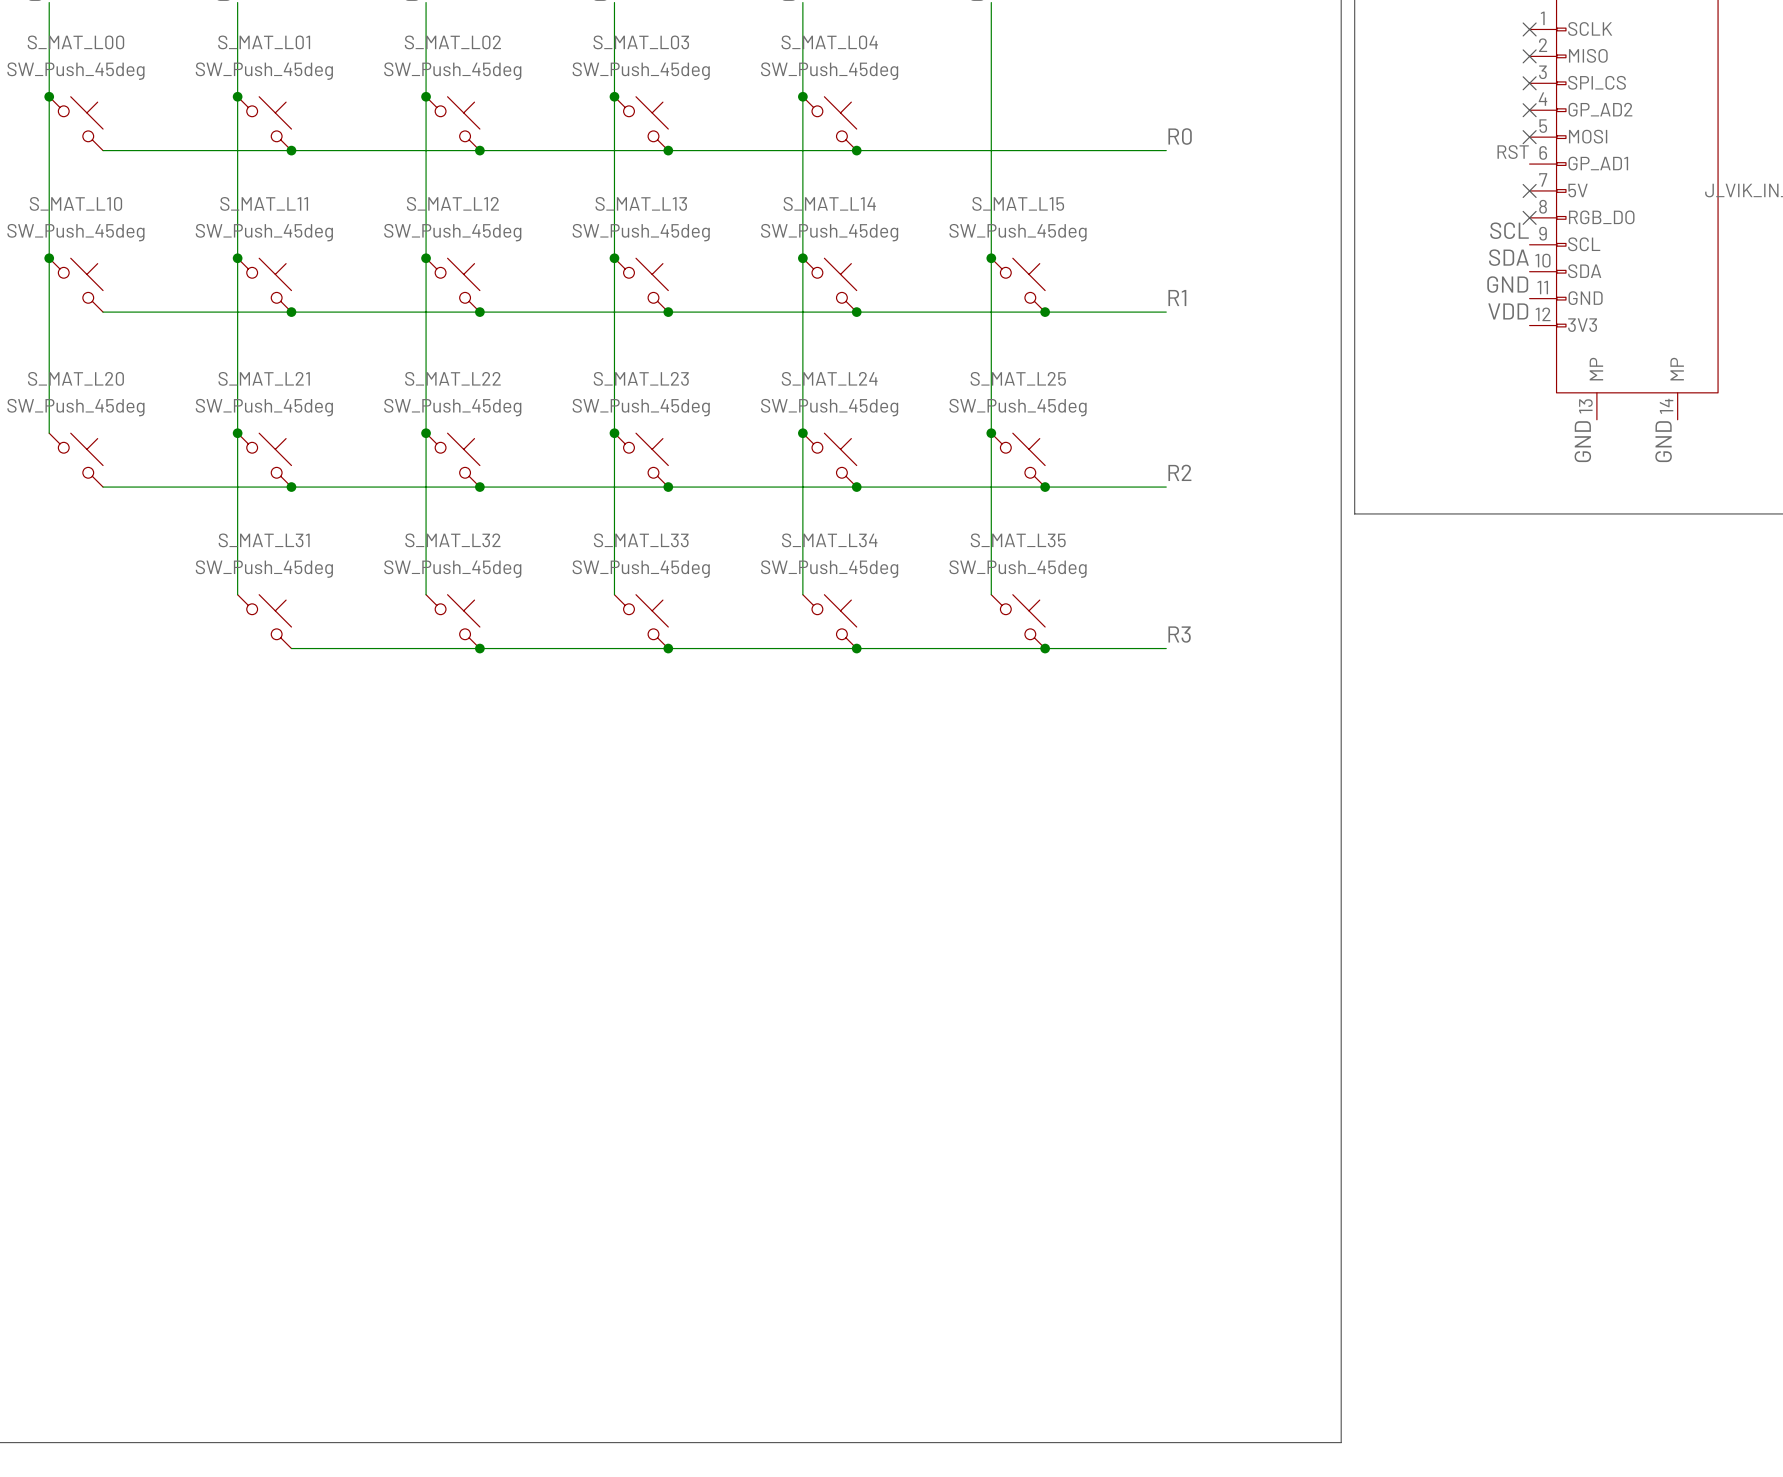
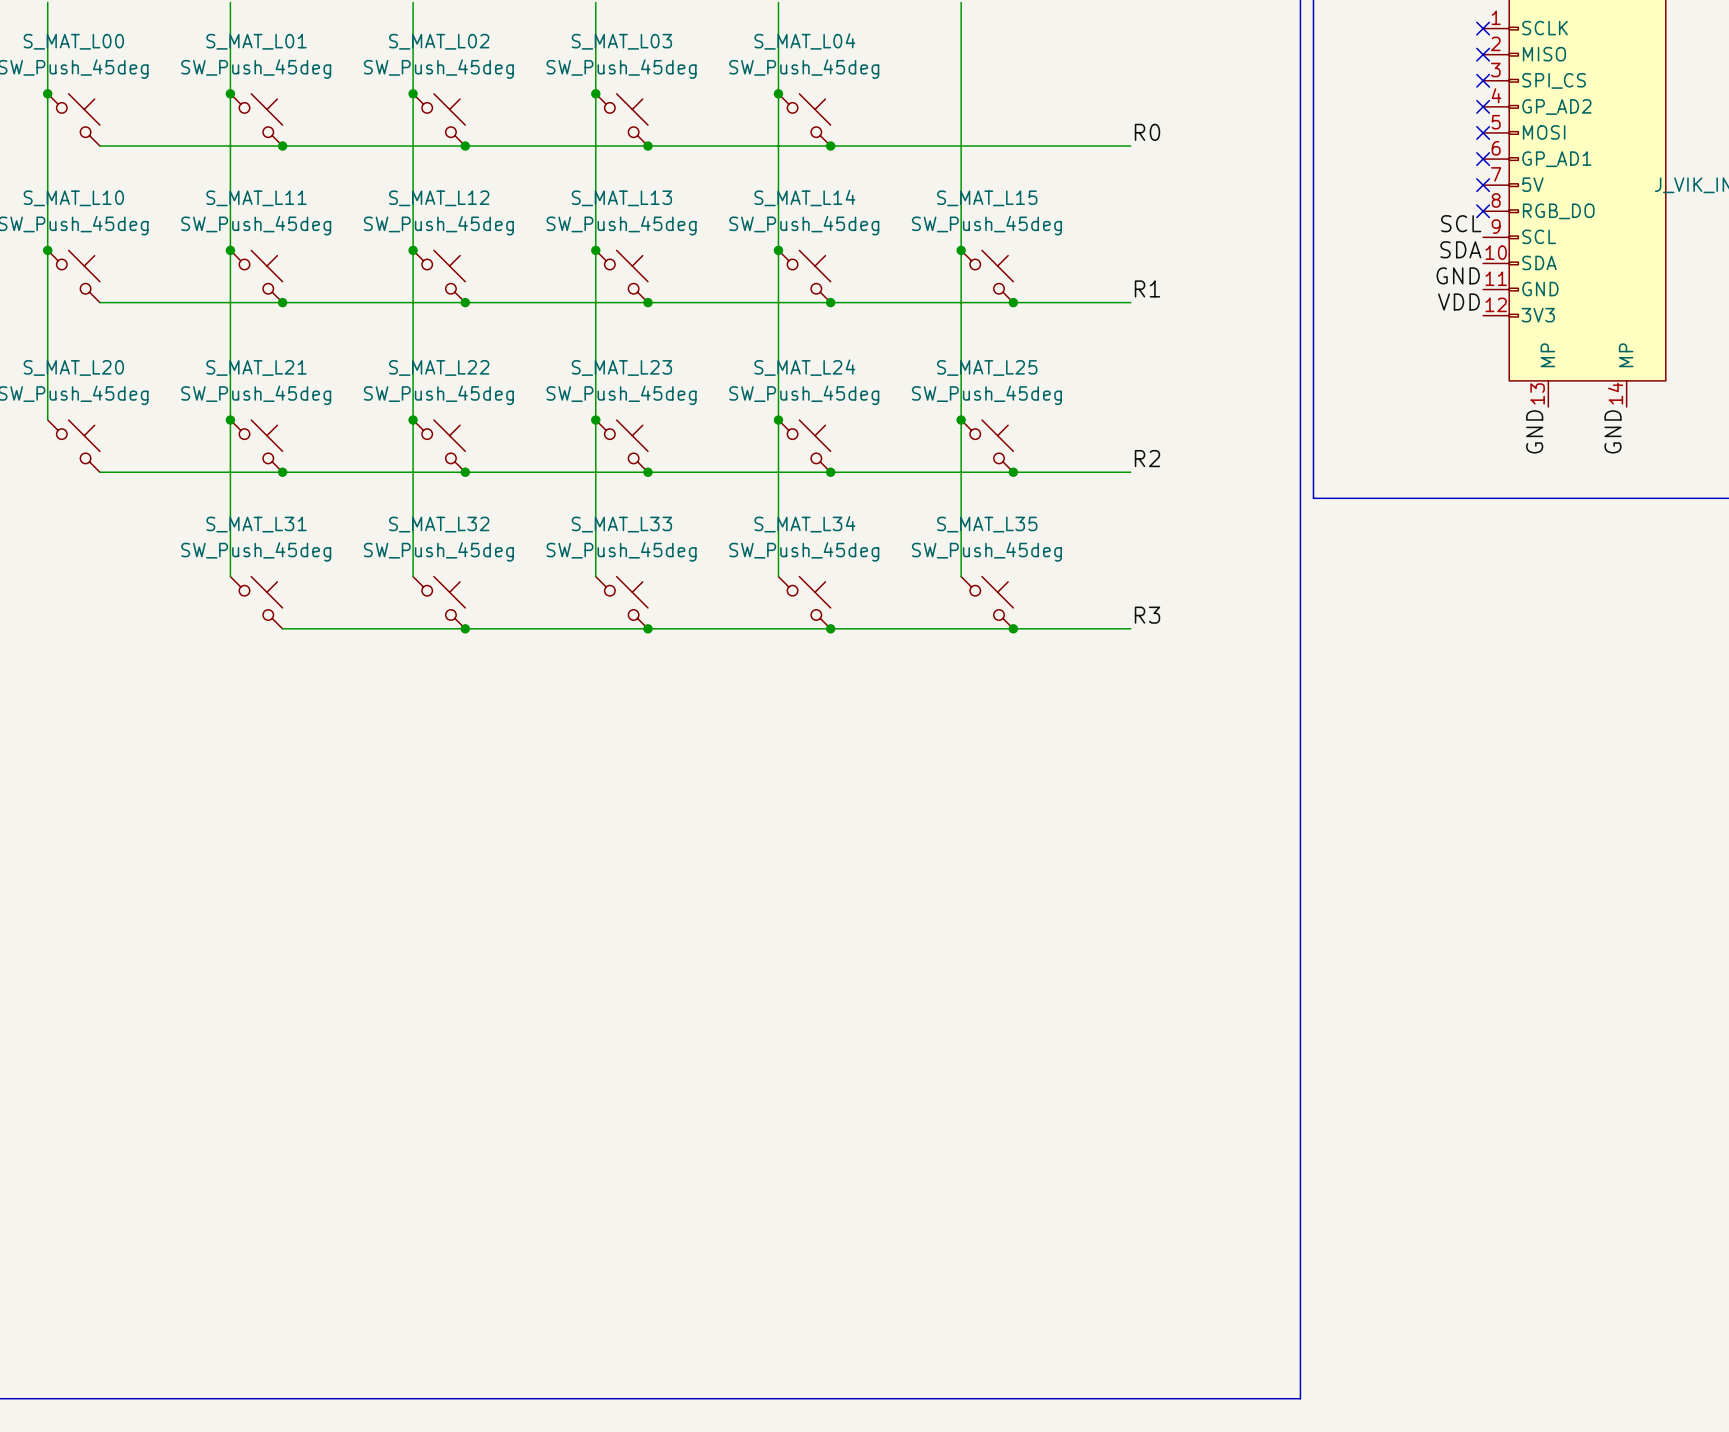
label: RST (1513, 152) -> none
no-connect mark: none -> (1483, 159)

